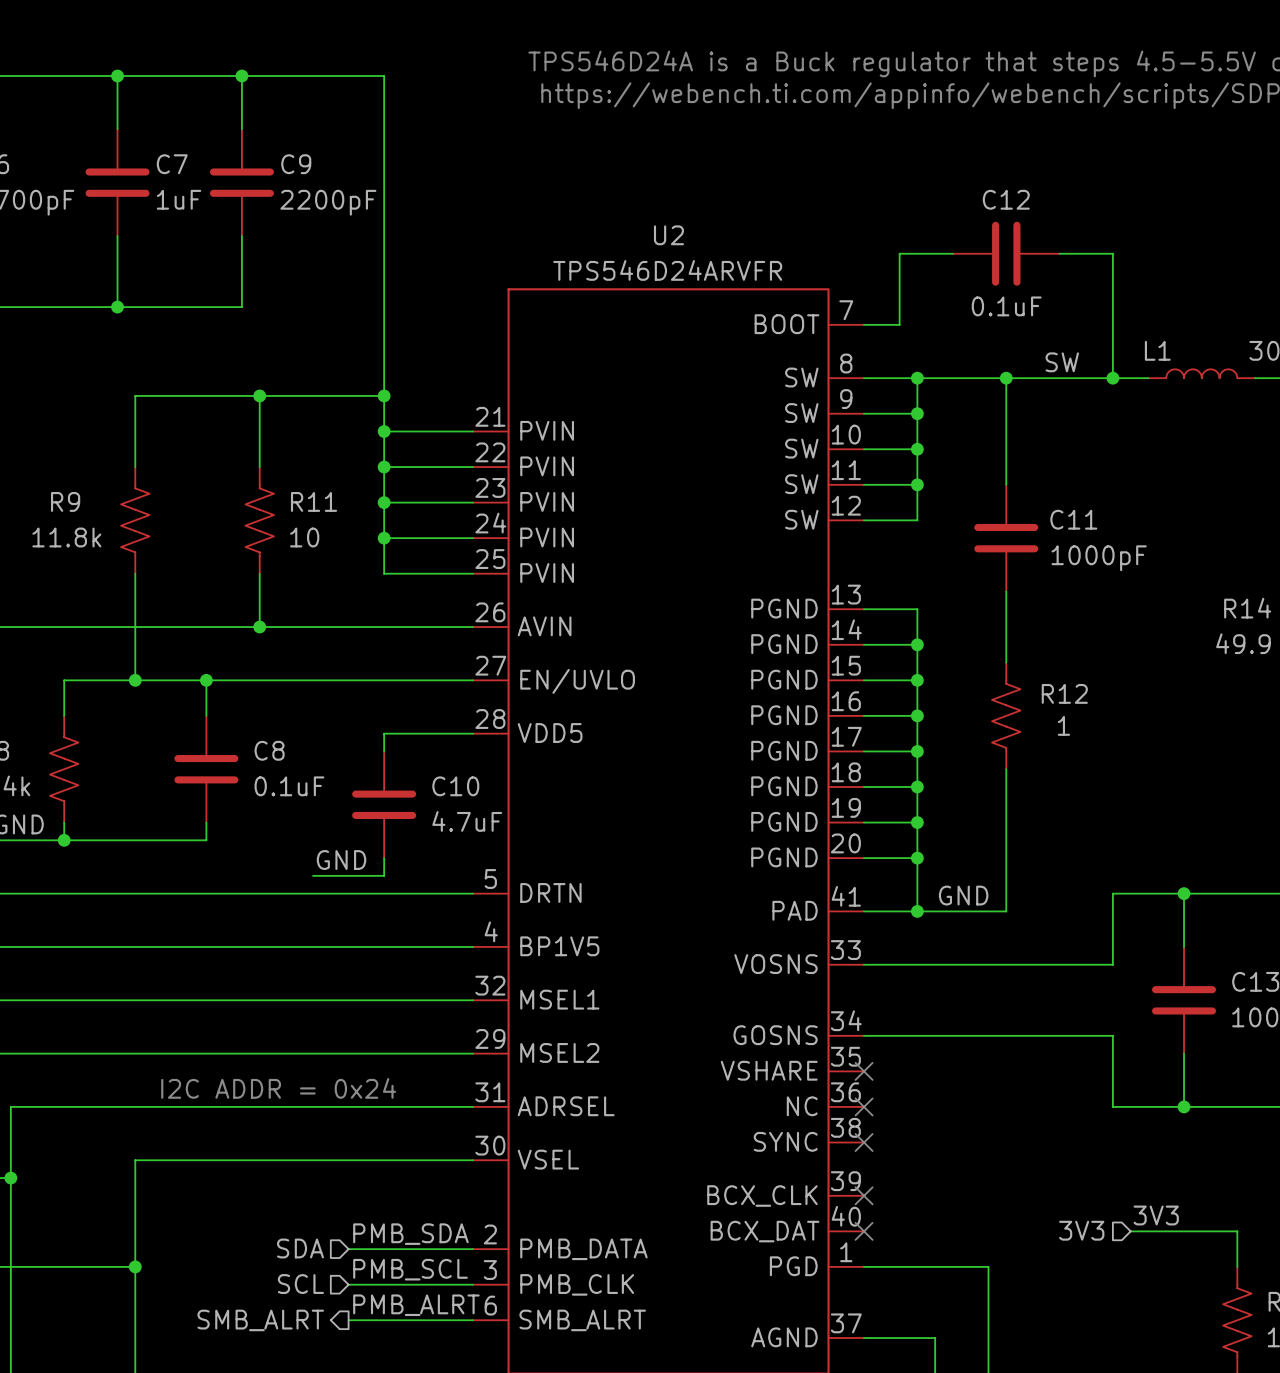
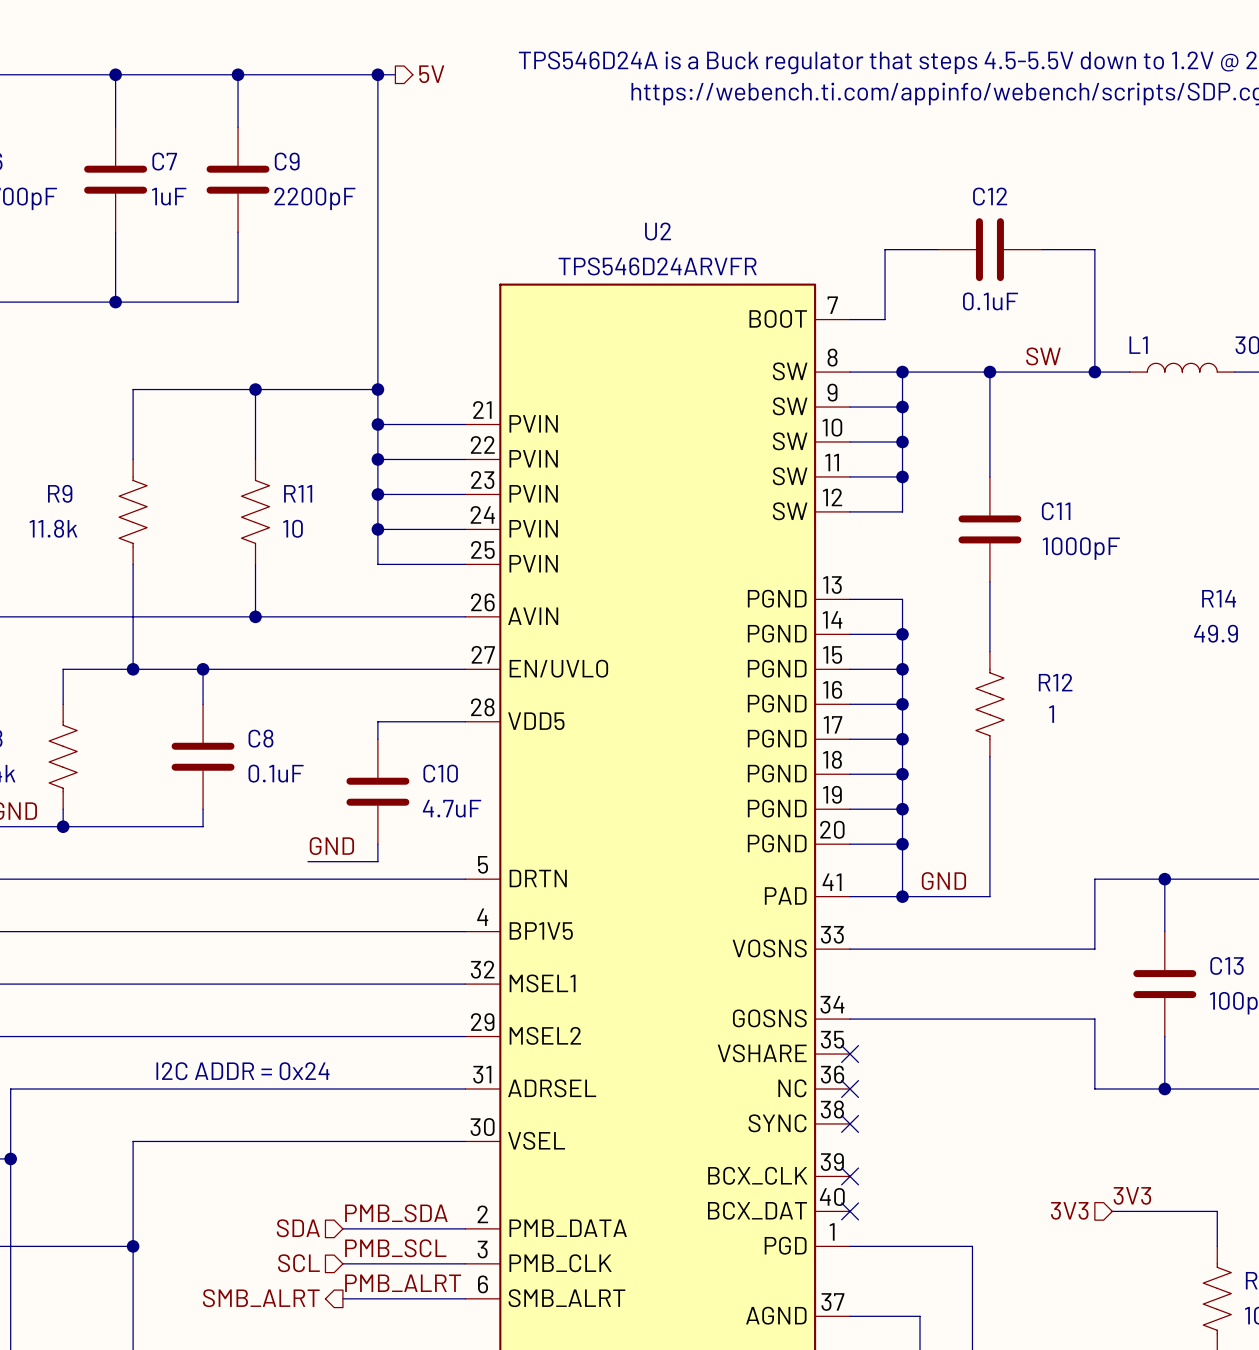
hierarchical label: none -> 5V (431, 74)
wire: none -> (377, 74) (395, 74)
junction: none -> (377, 74)

